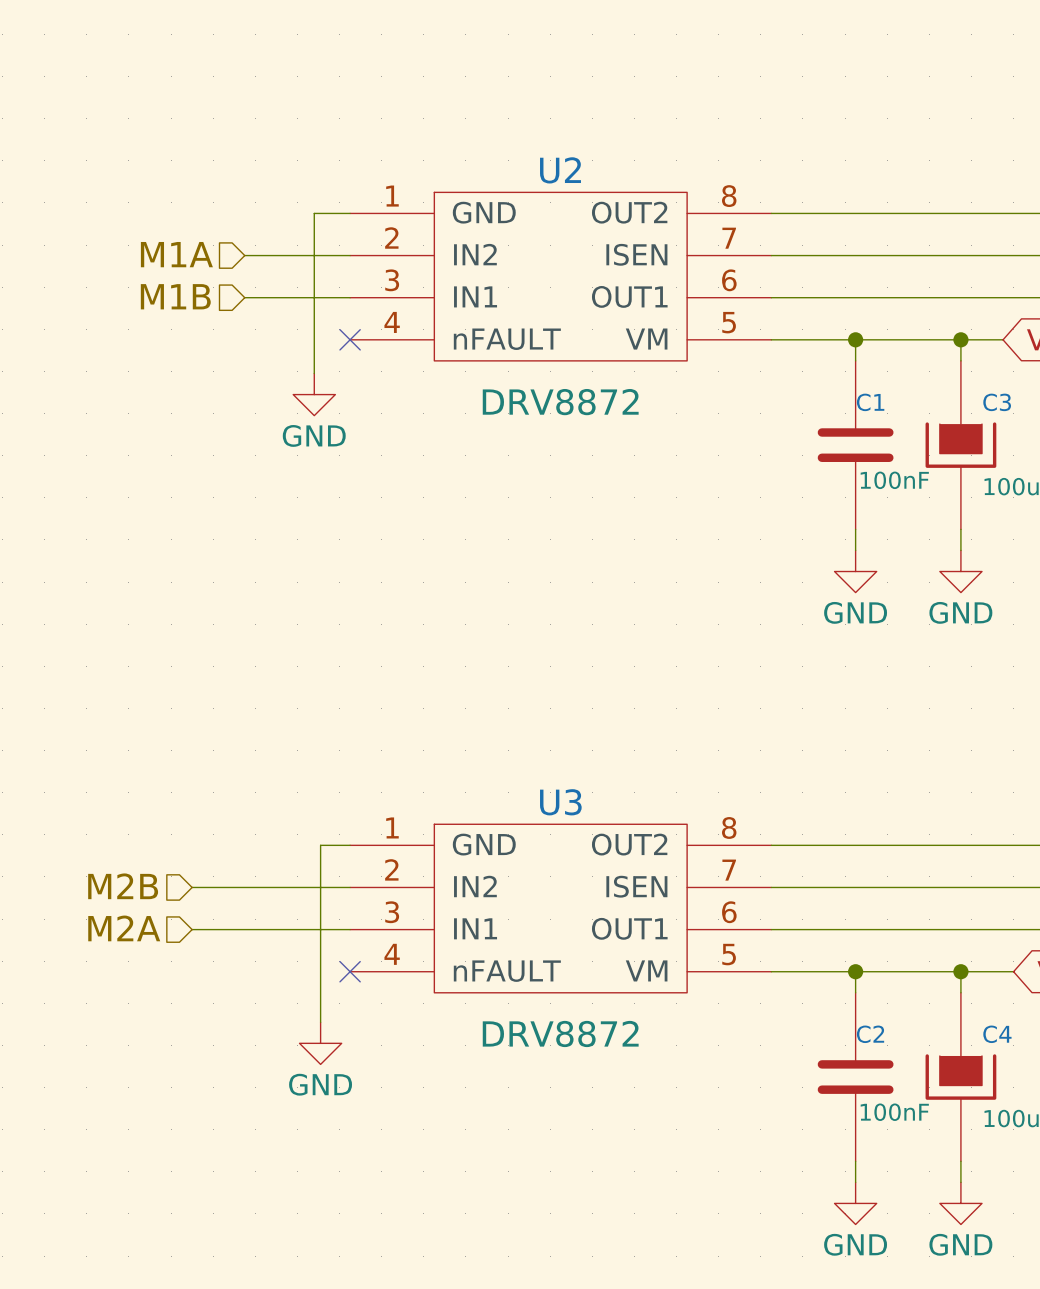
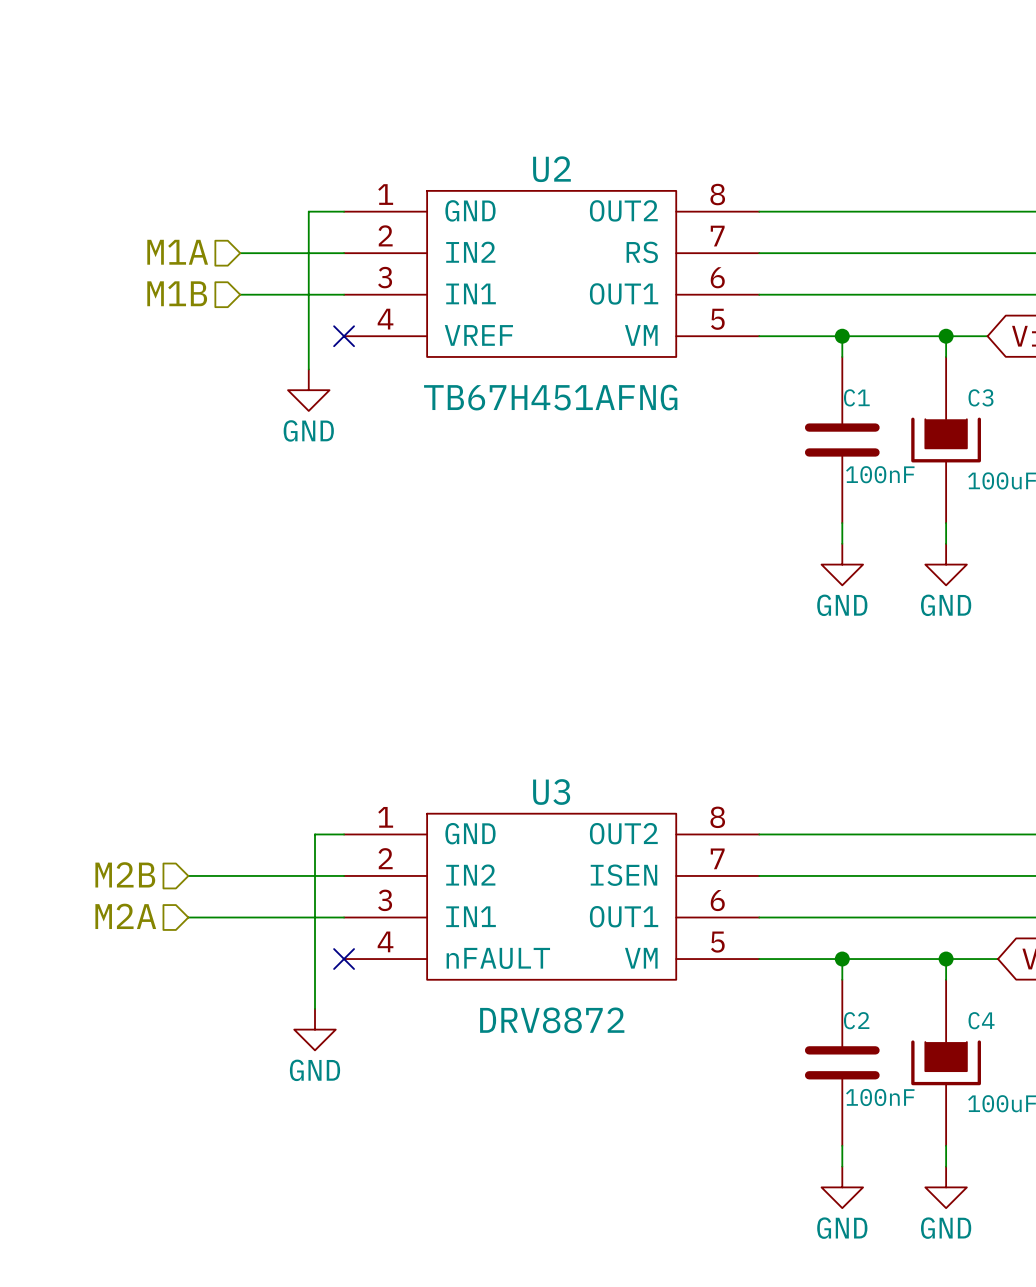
U2 pin name: ISEN (636, 254) -> RS (642, 252)
U2 pin name: nFAULT (507, 339) -> VREF (478, 335)
U2 value: DRV8872 (560, 402) -> TB67H451AFNG (550, 397)

